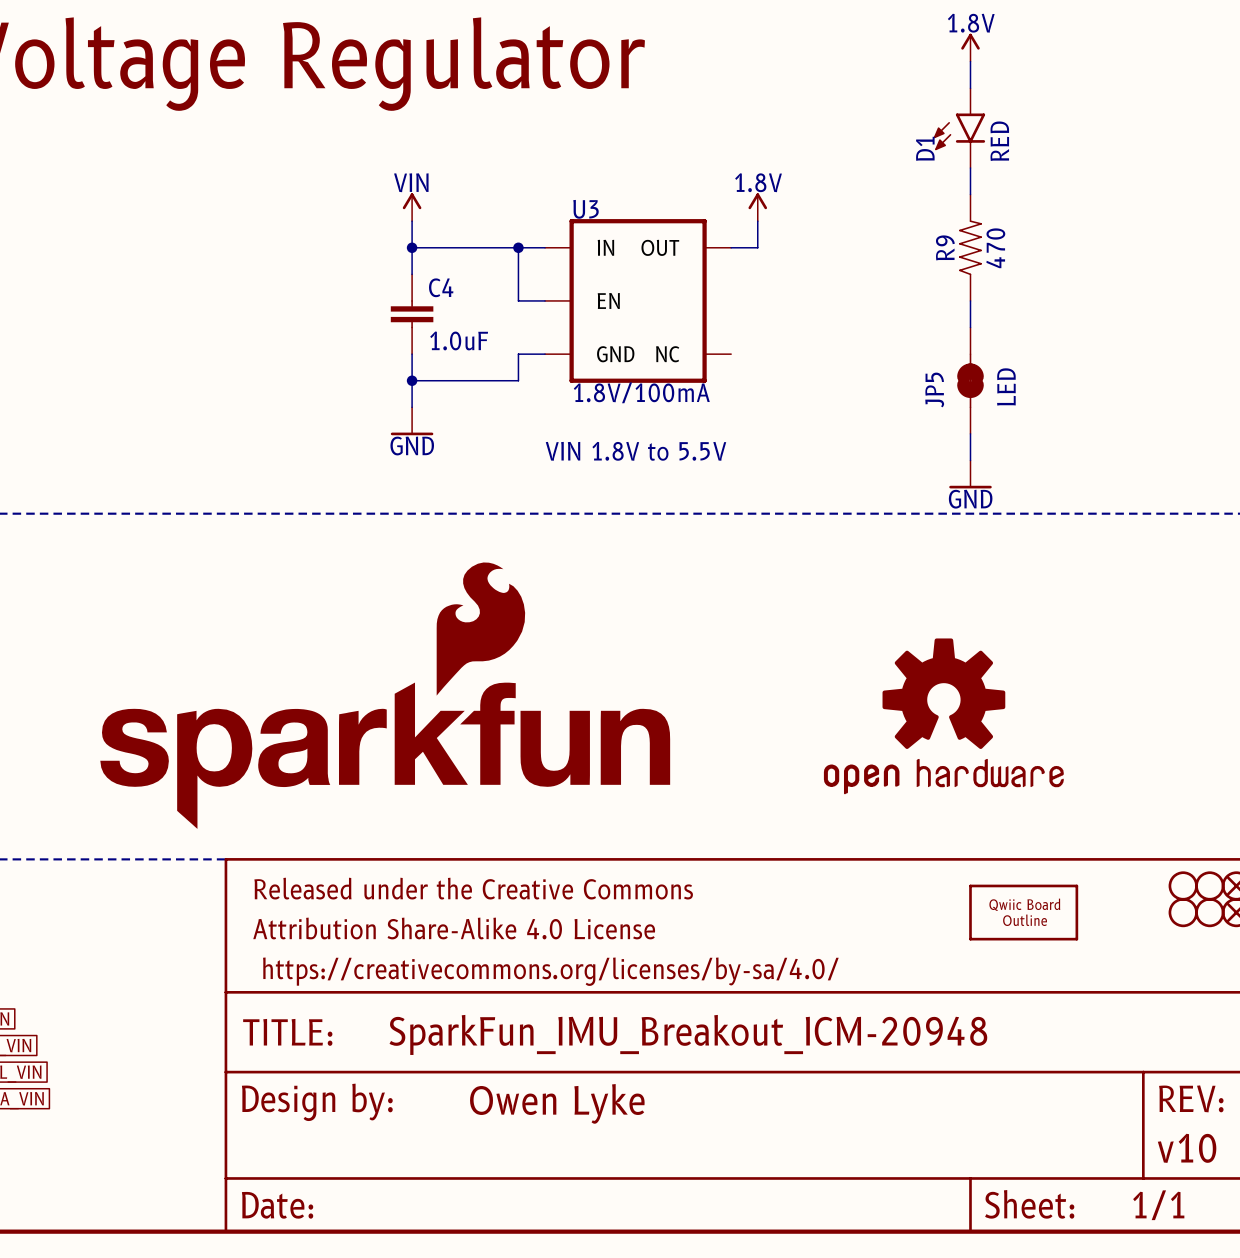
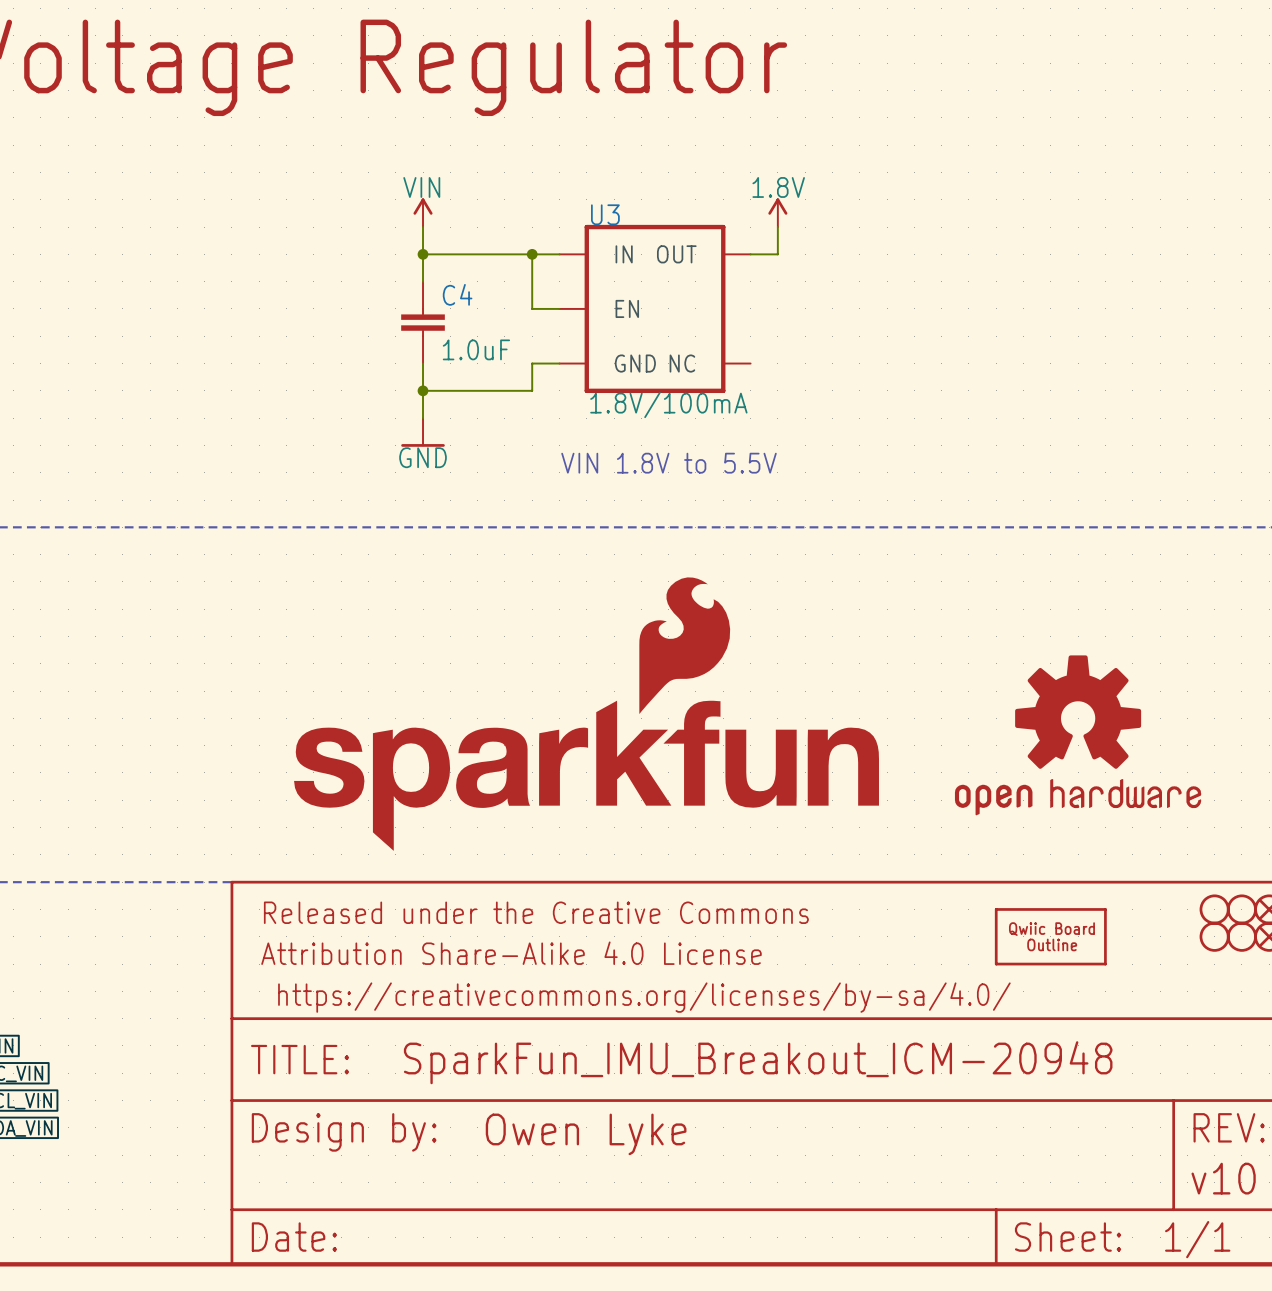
power symbol: 1.8V (970, 47) -> none
wire: (970, 61) (970, 88) -> none
D1: RED (959, 128) -> none
wire: (970, 168) (970, 194) -> none
R9: 470 (970, 247) -> none
wire: (970, 300) (970, 327) -> none
JP5: LED (970, 380) -> none
wire: (970, 433) (970, 460) -> none
power symbol: GND (970, 474) -> none
part position: (385, 695) -> (586, 714)
part position: (943, 716) -> (1078, 735)

